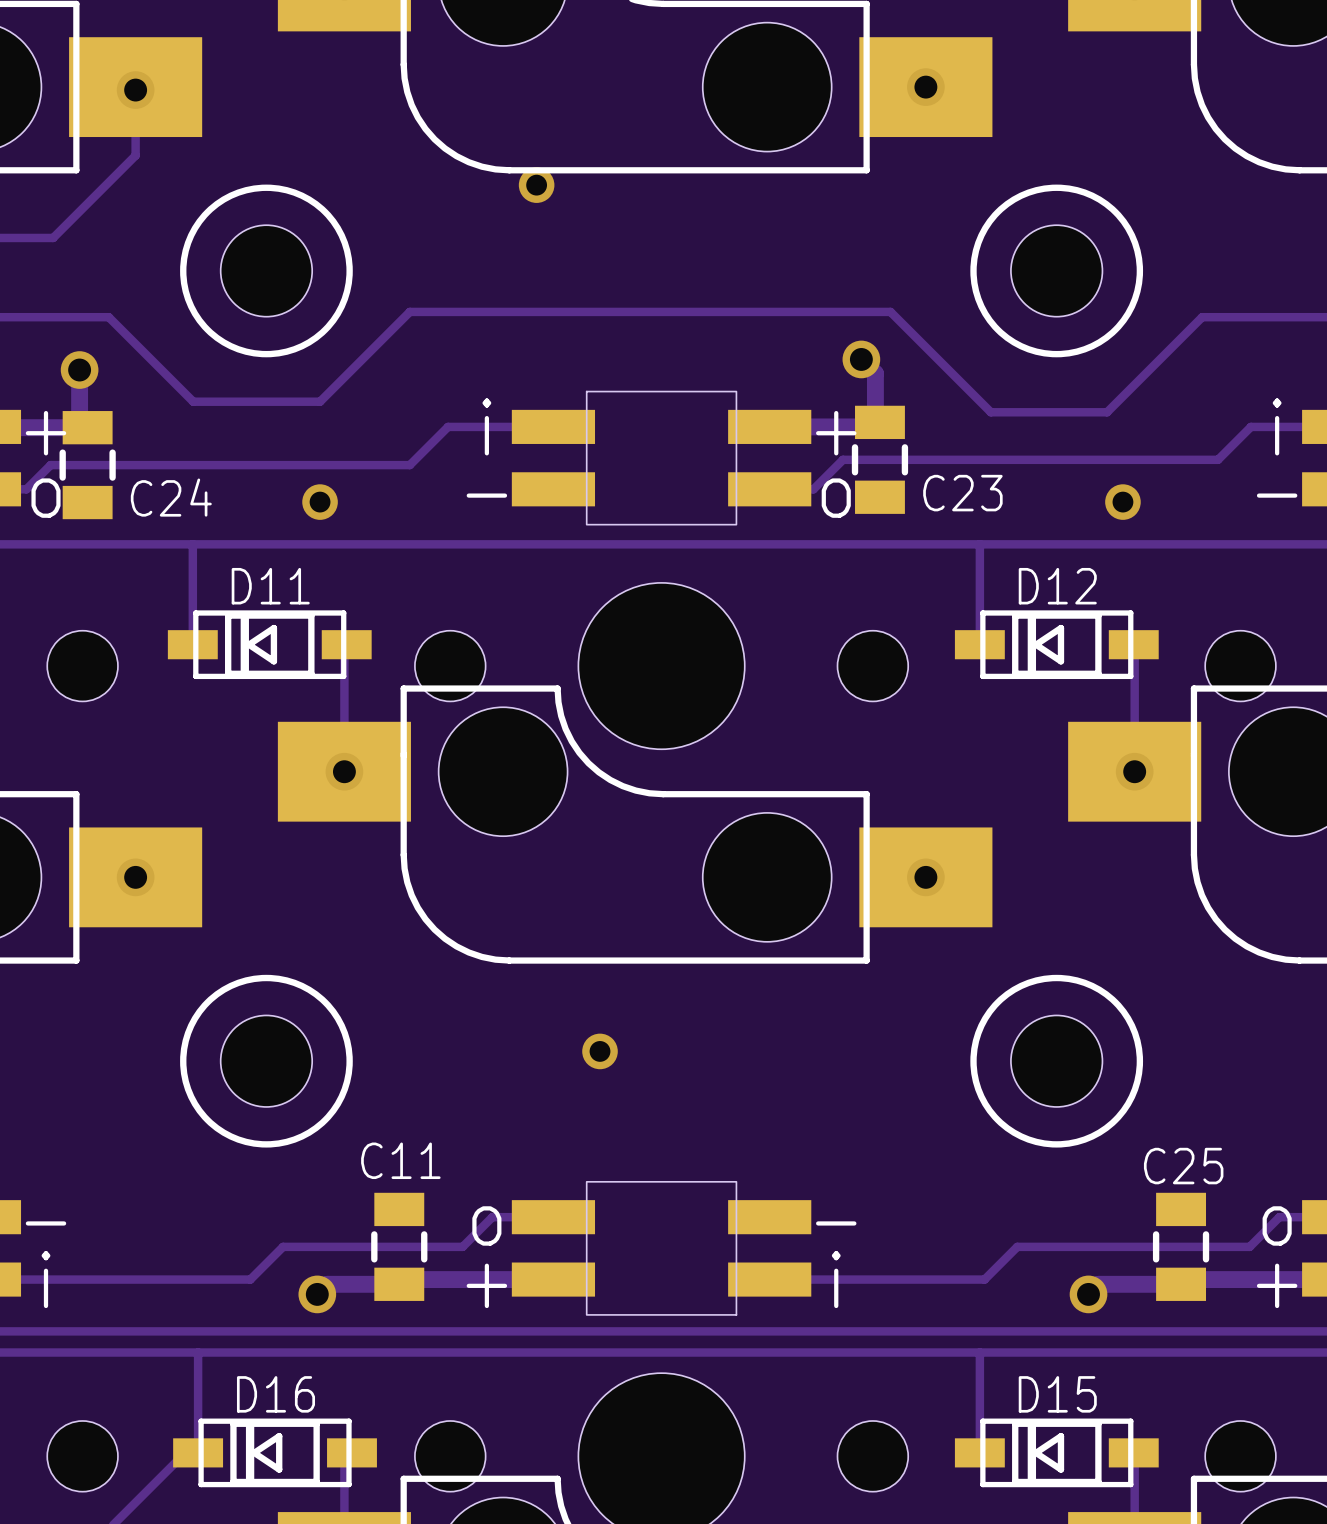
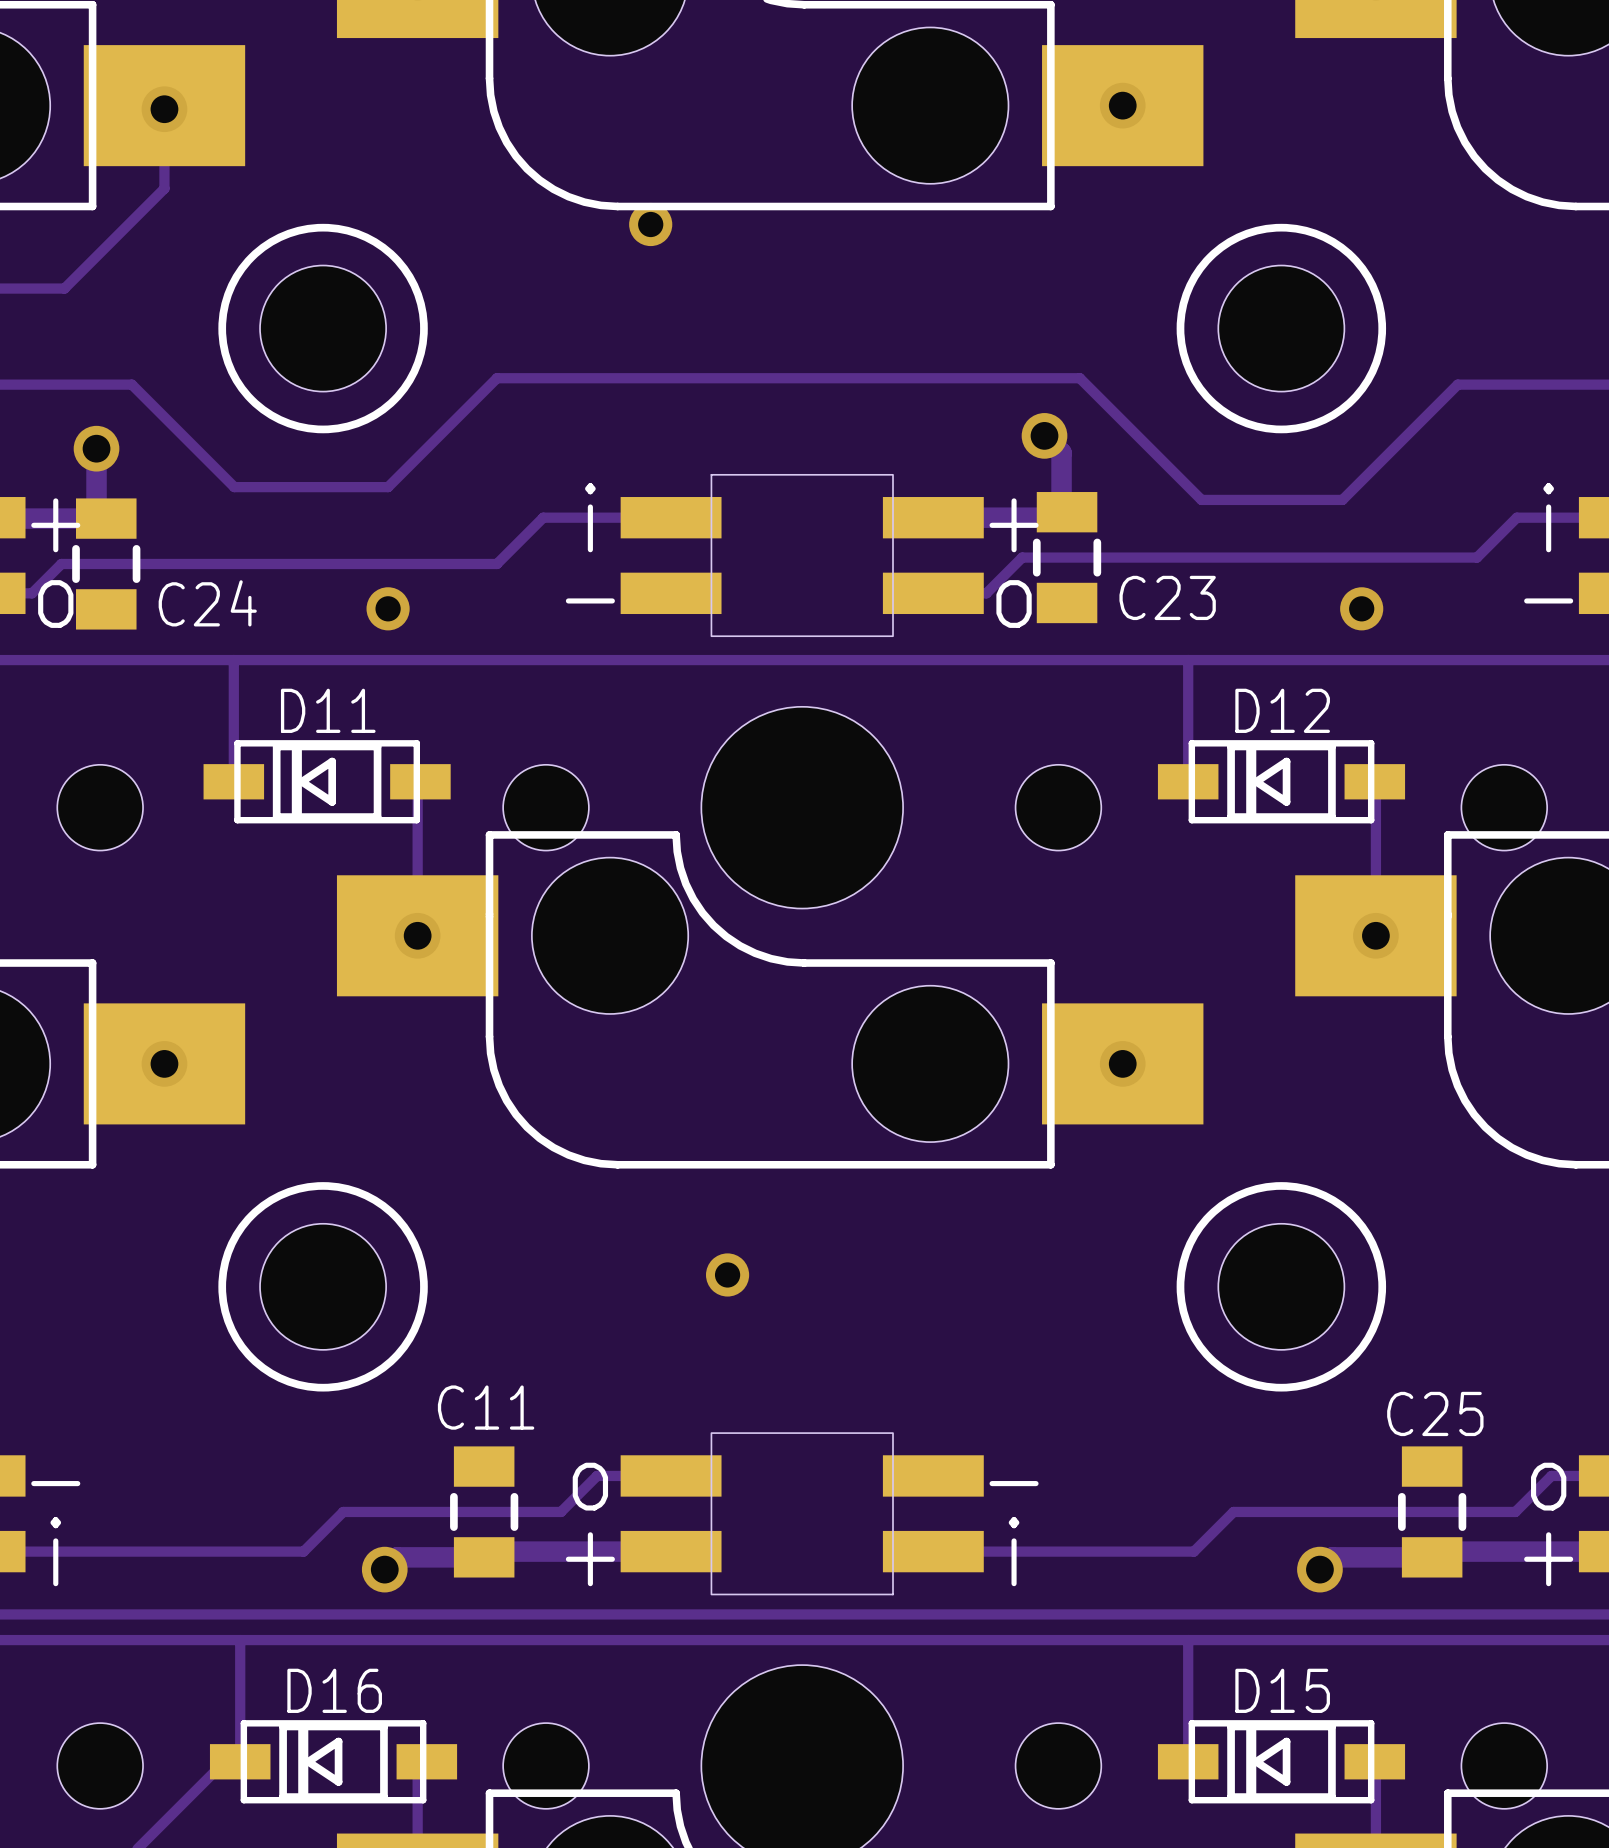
part footprint: [180, 184, 353, 358] -> [218, 223, 428, 434]
part footprint: [970, 184, 1144, 358] -> [1176, 223, 1387, 434]
part footprint: [180, 974, 353, 1148] -> [218, 1182, 428, 1392]
part footprint: [970, 974, 1144, 1148] -> [1176, 1182, 1387, 1392]

